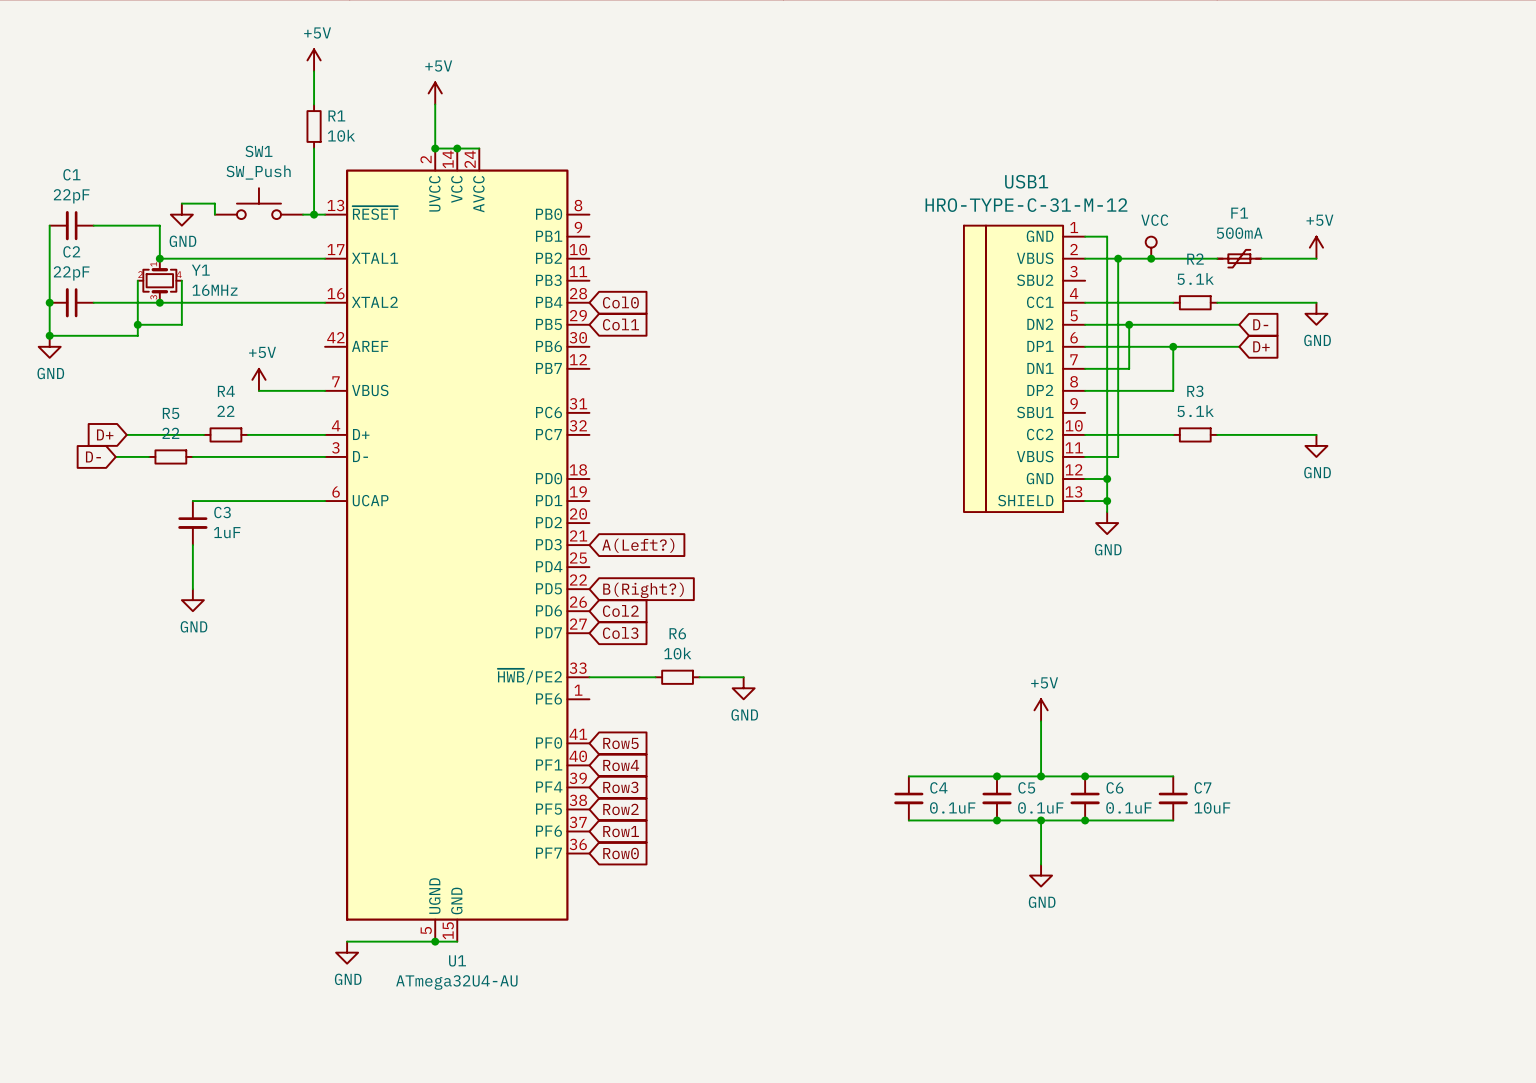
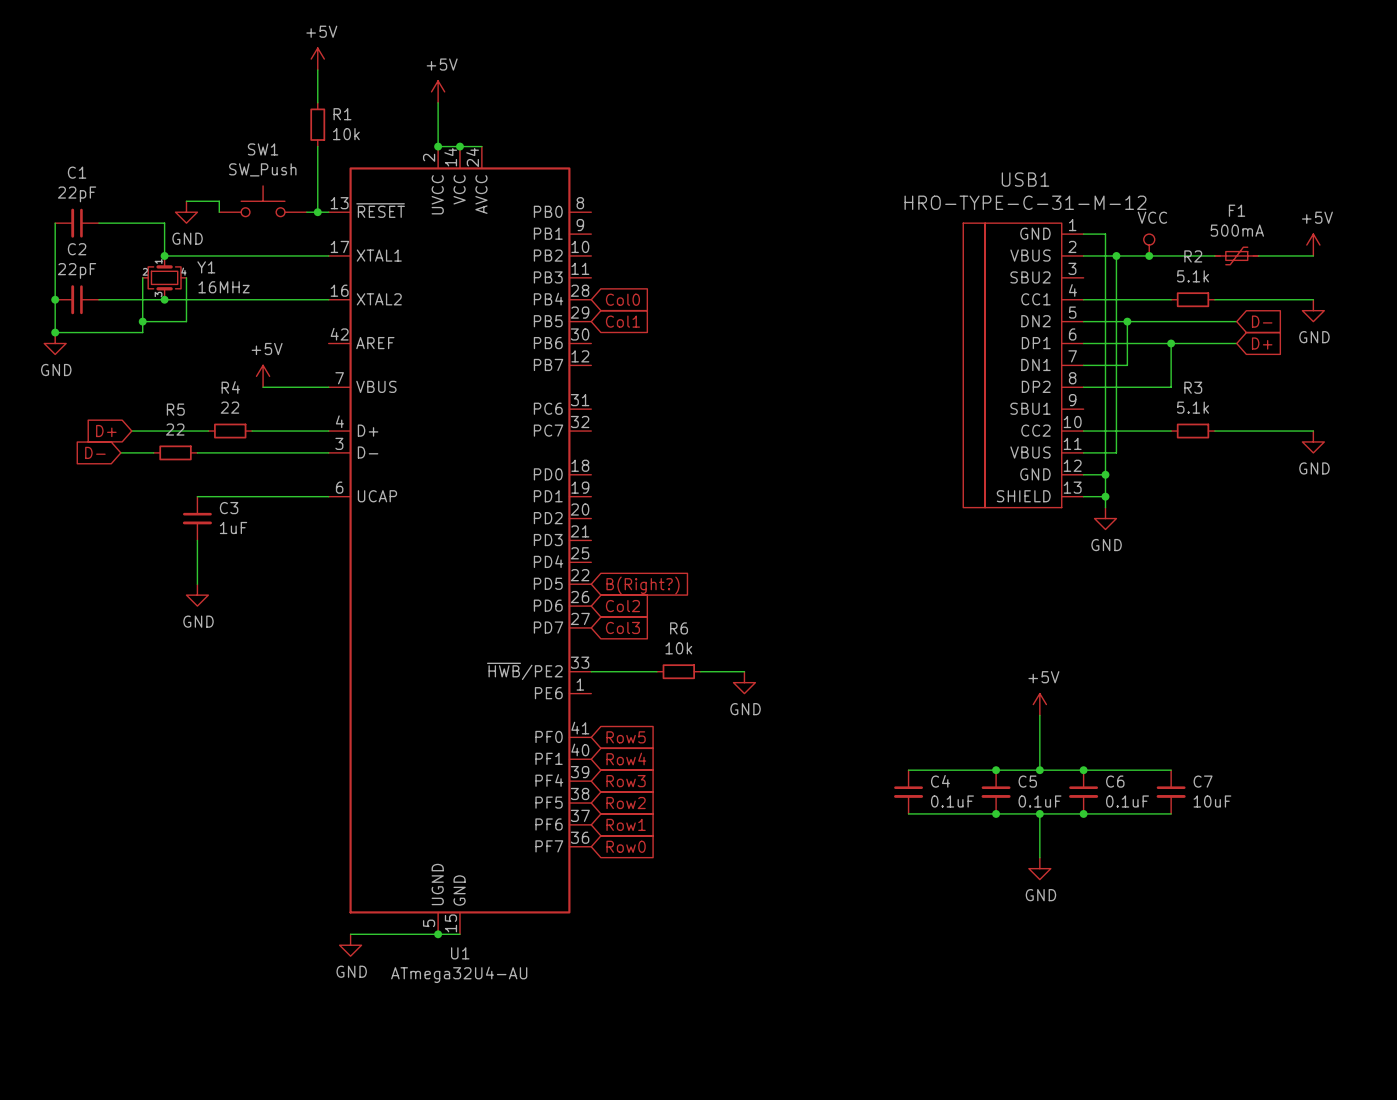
global label: A(Left?) (638, 545) -> none

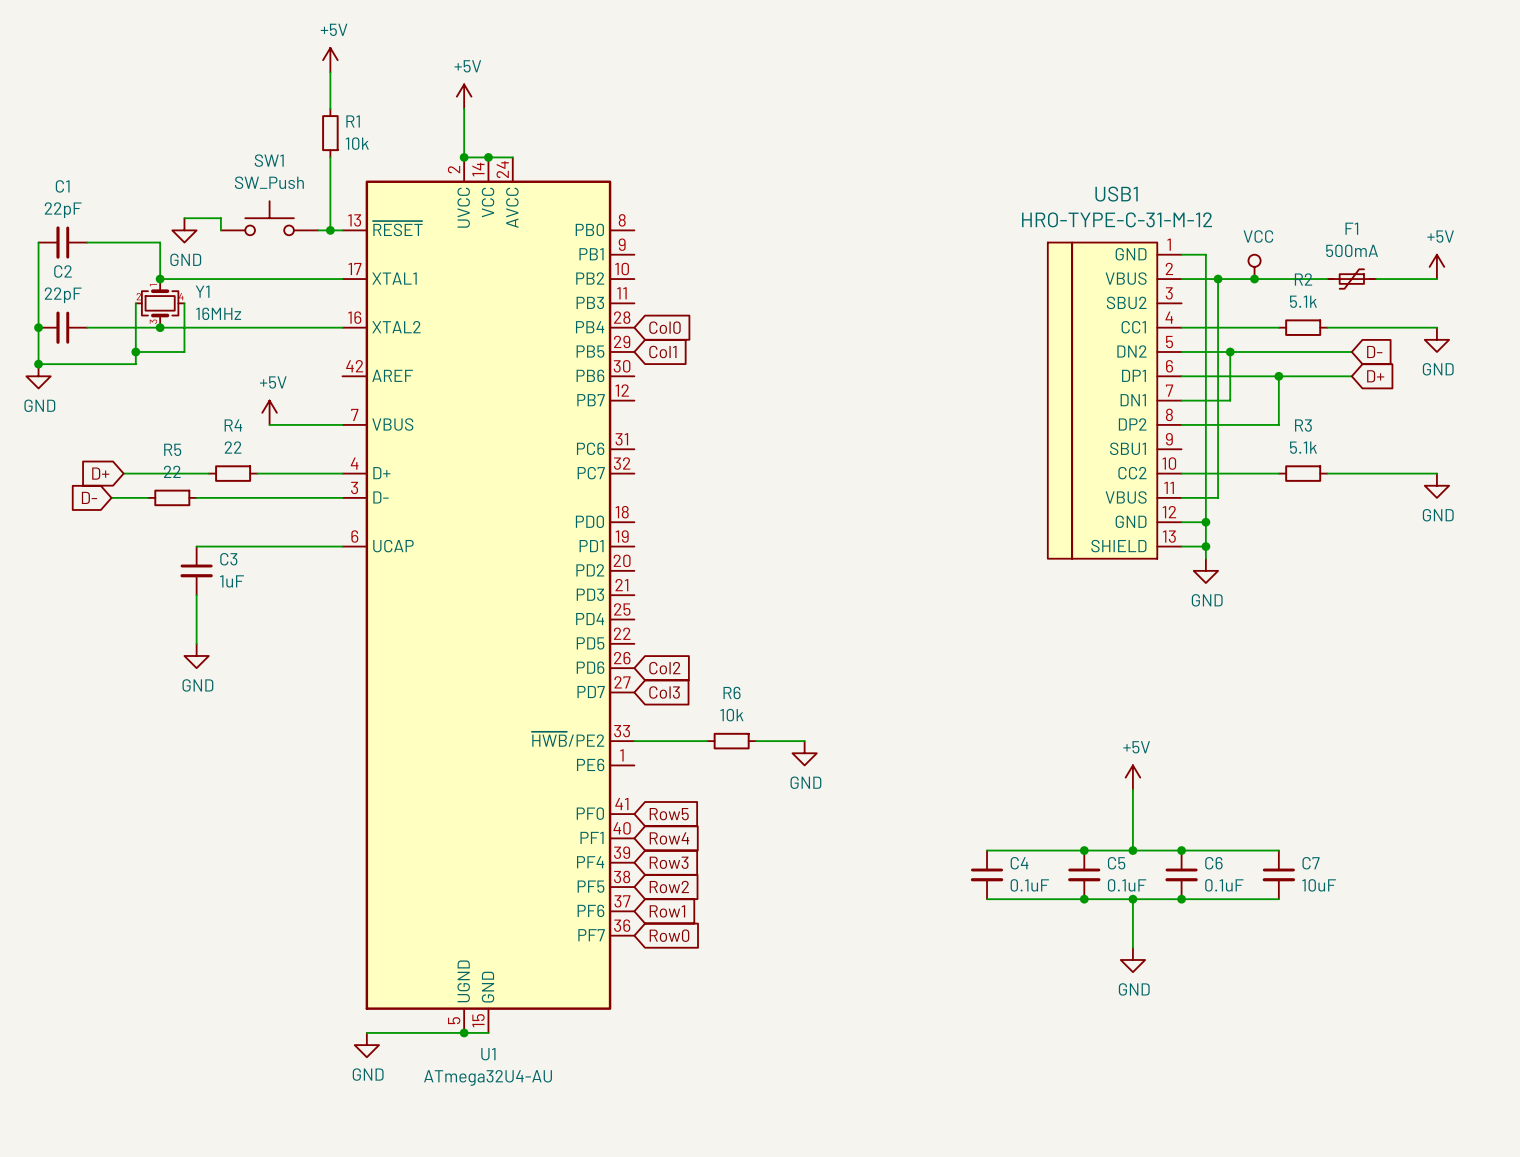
global label: B(Right?) (643, 585) -> none

